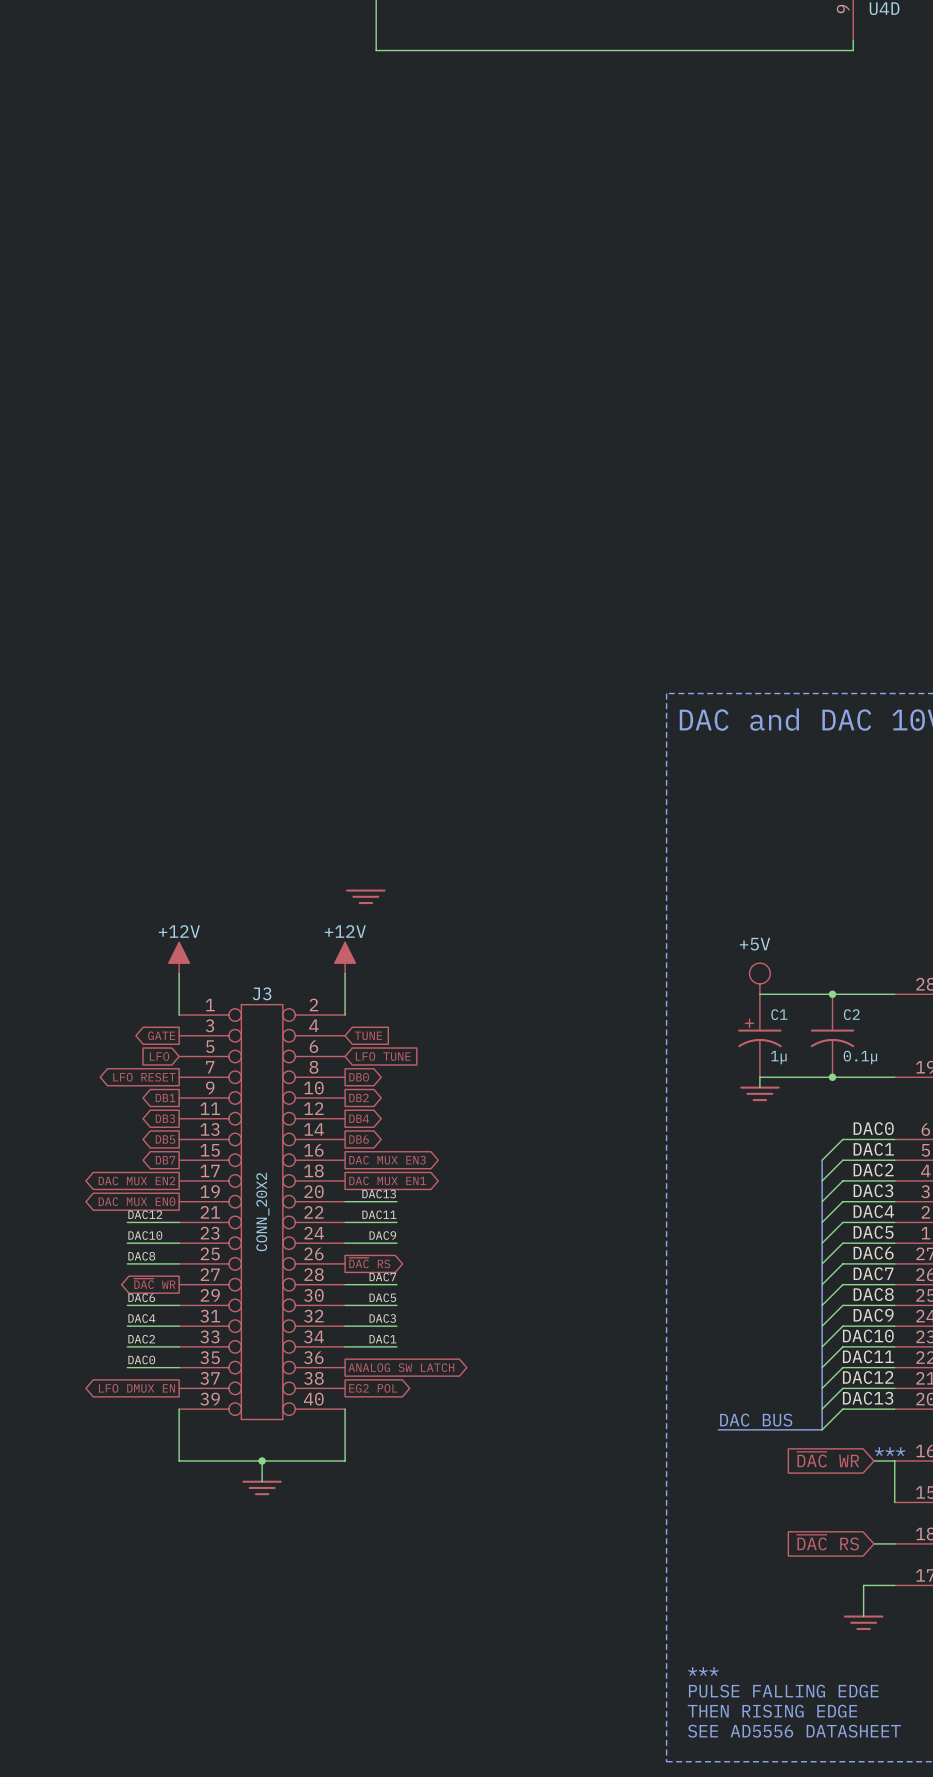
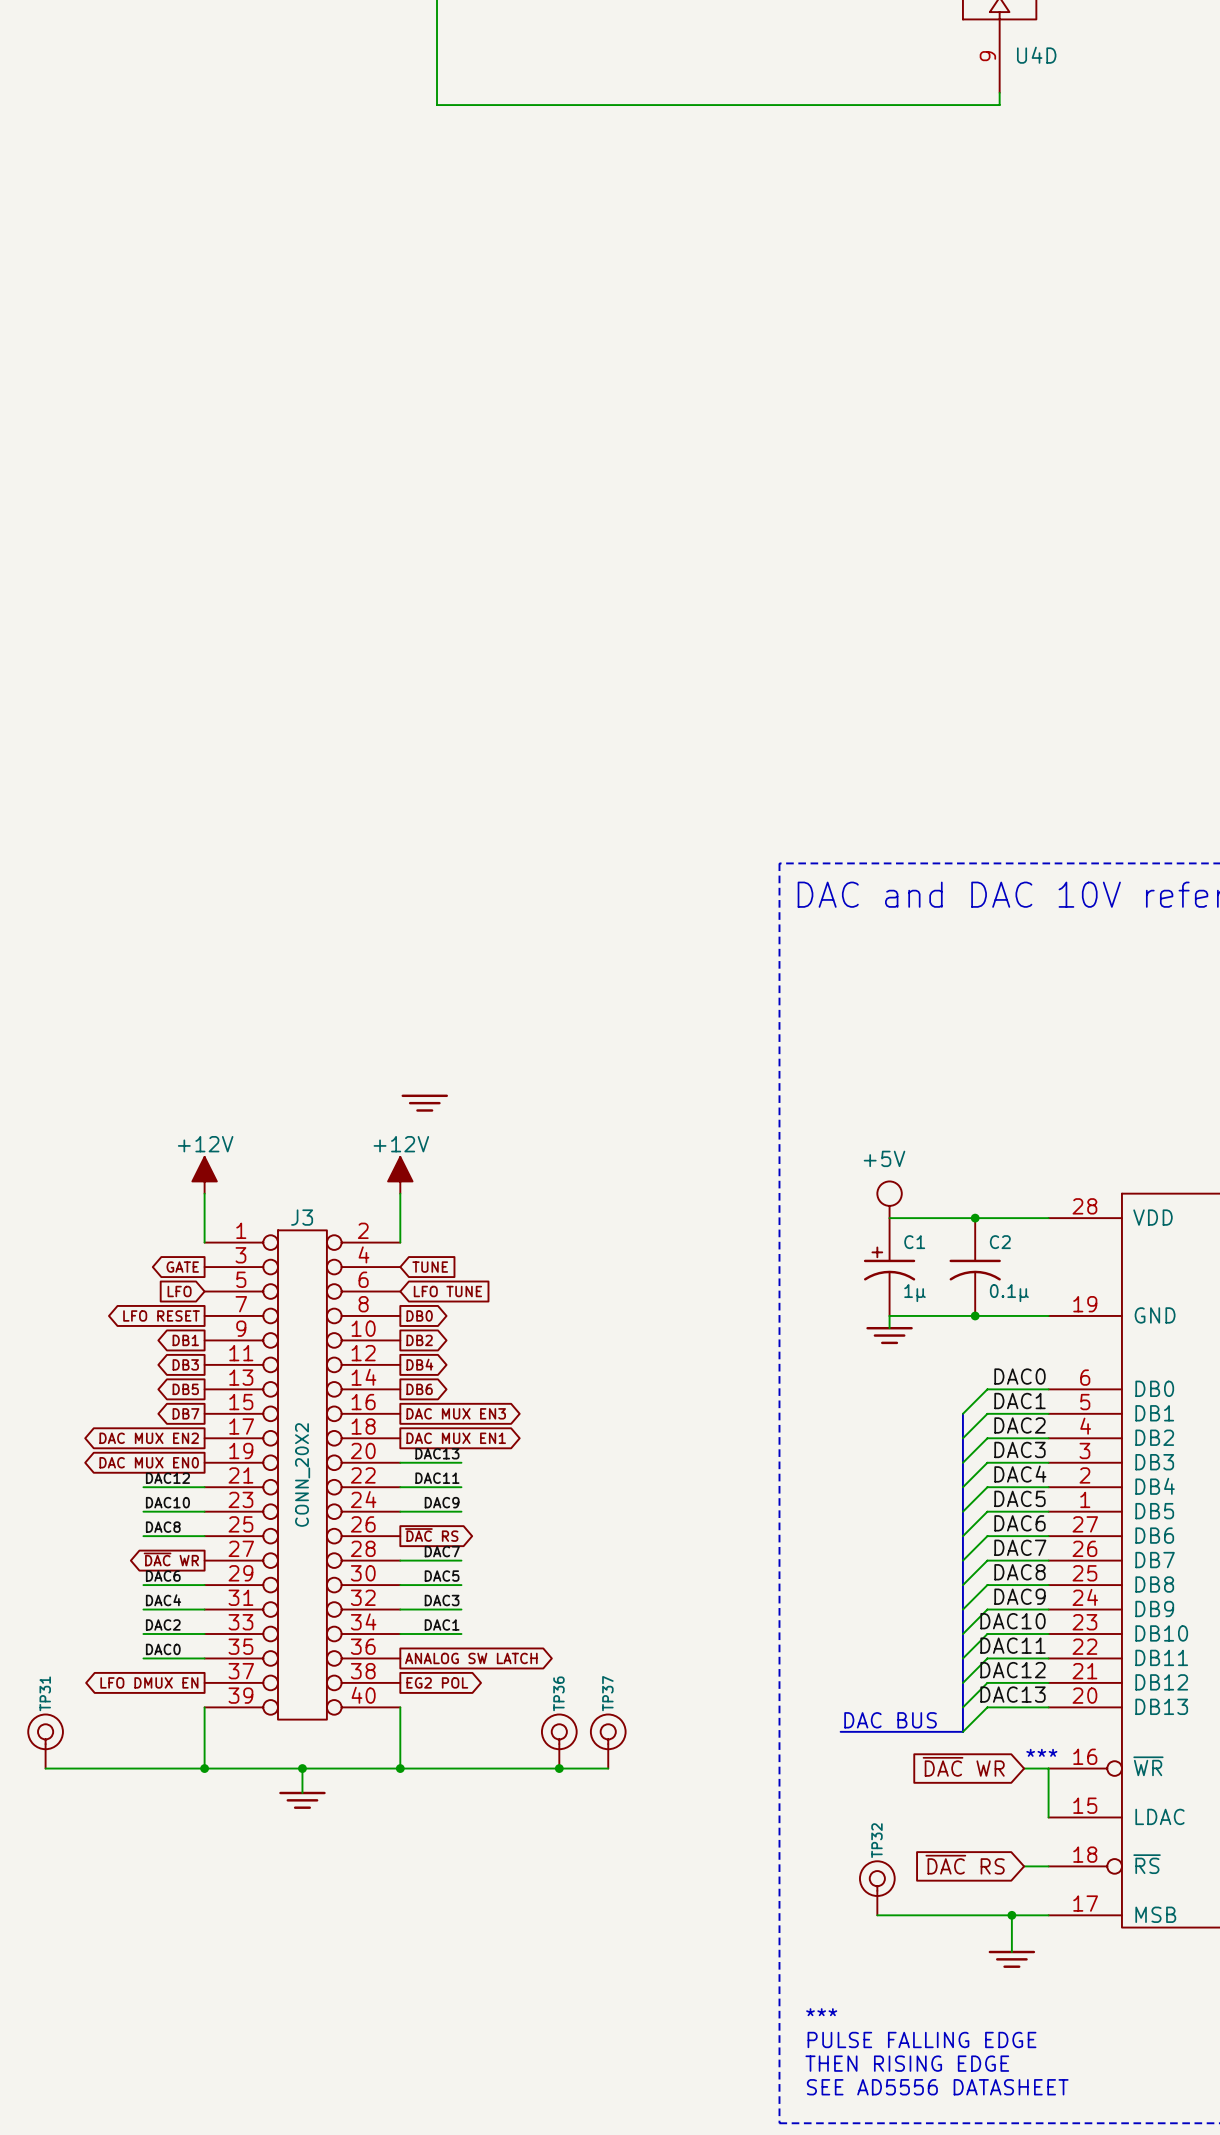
TP31: none -> (45, 1741)
TP36: none -> (559, 1741)
TP37: none -> (608, 1741)
wire: none -> (45, 1768) (204, 1768)
junction: none -> (204, 1768)
wire: none -> (400, 1768) (608, 1768)
junction: none -> (400, 1768)
junction: none -> (559, 1768)
TP32: none -> (877, 1888)
wire: none -> (877, 1915) (1011, 1915)
junction: none -> (1011, 1915)

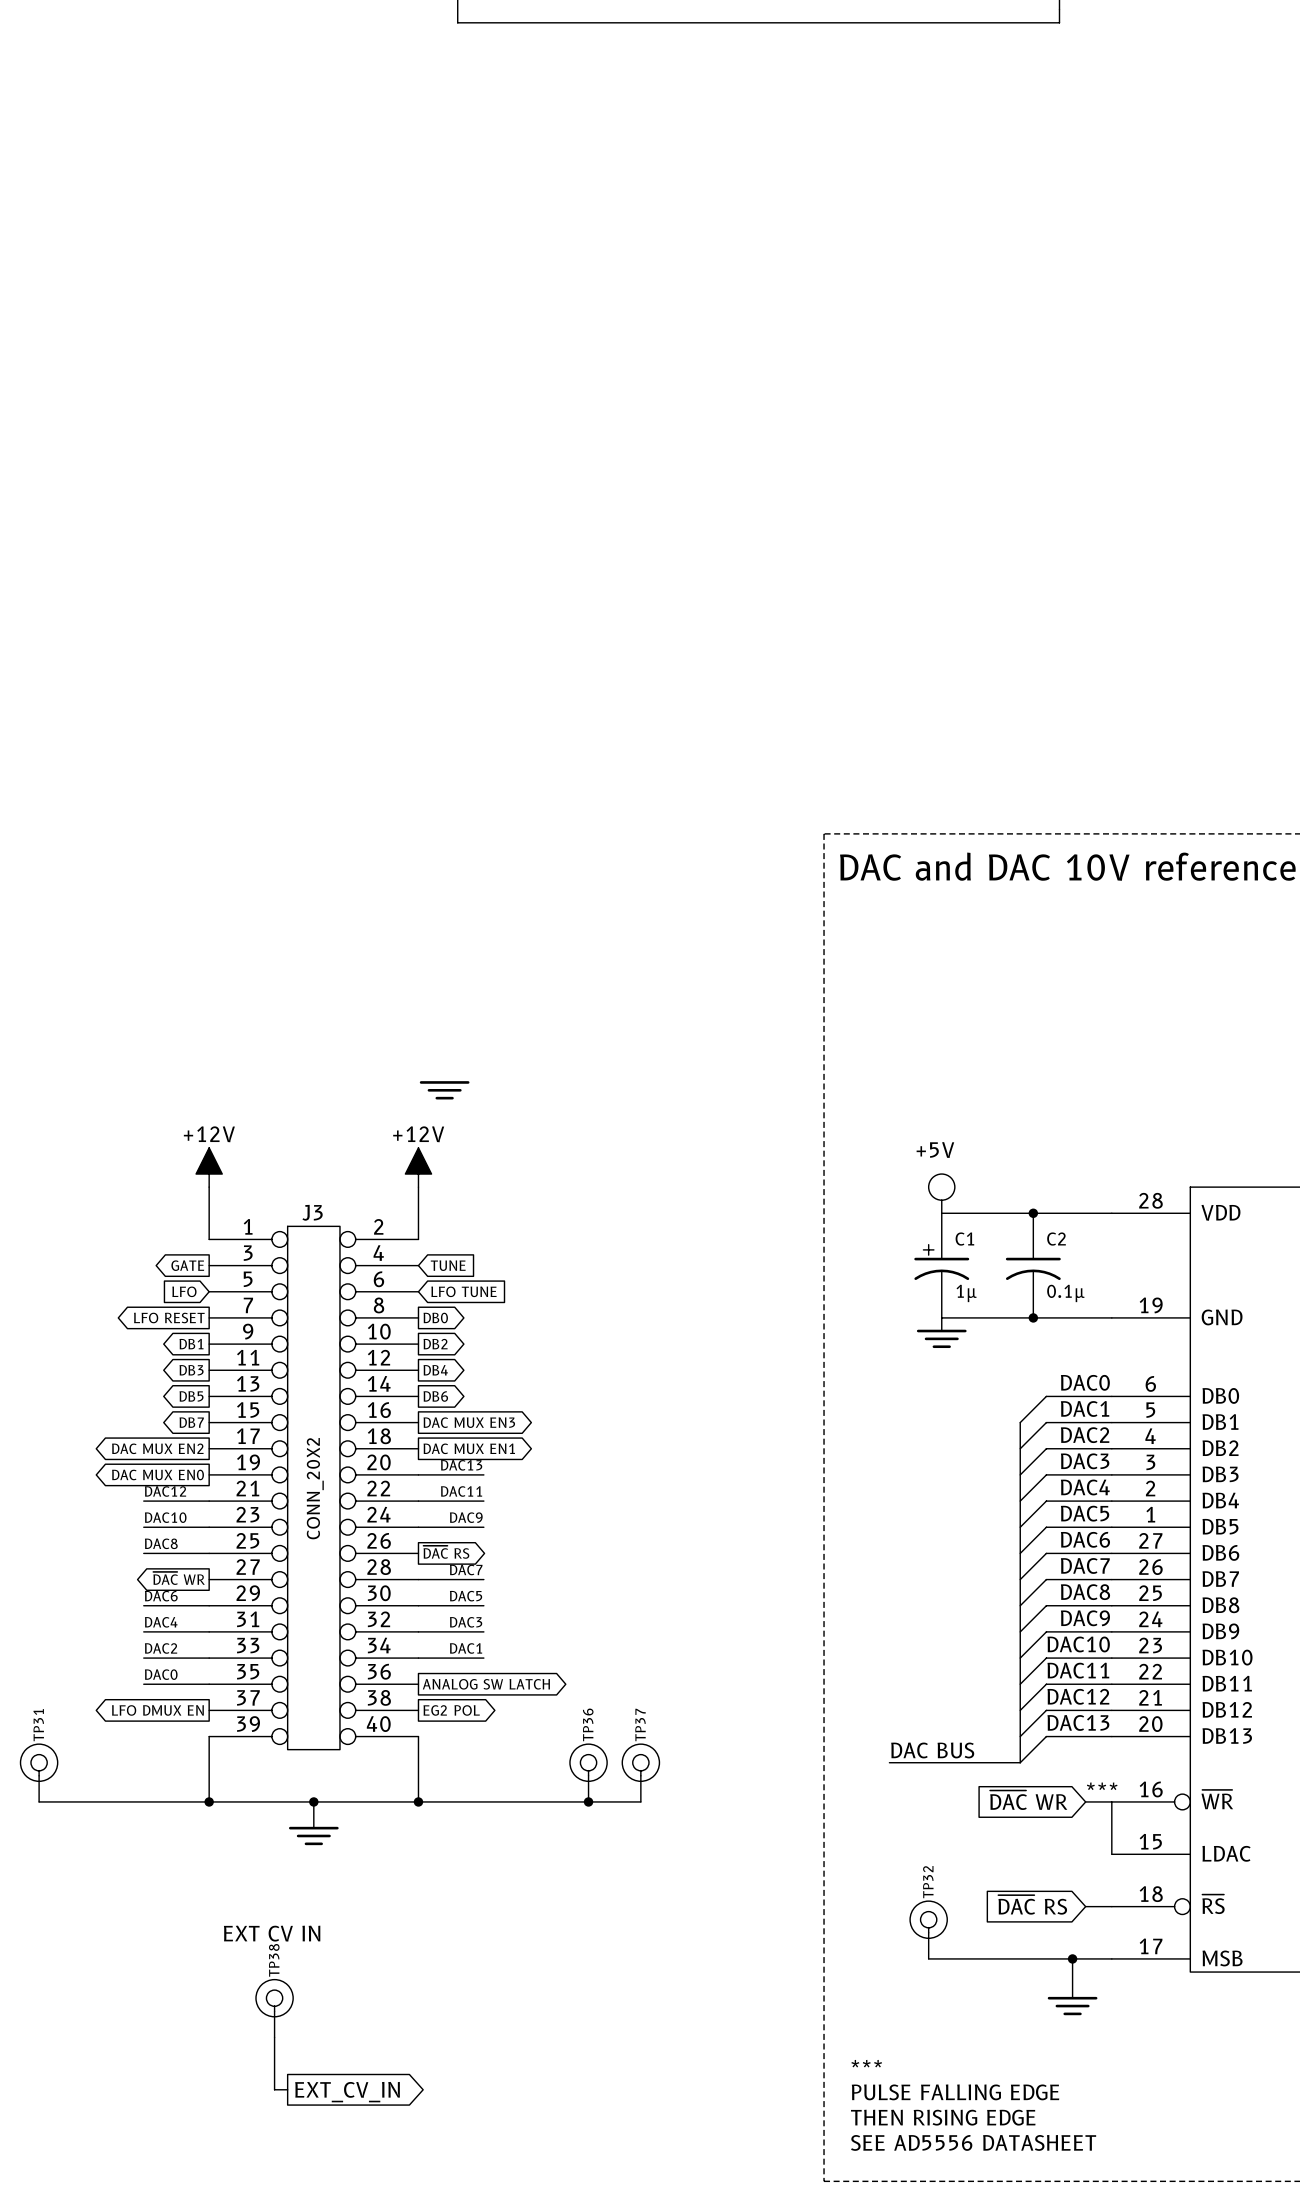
text: none -> EXT CV IN (272, 1933)
TP38: none -> (274, 2008)
wire: none -> (274, 2037) (274, 2089) (287, 2089)
global label: none -> EXT_CV_IN (347, 2092)

